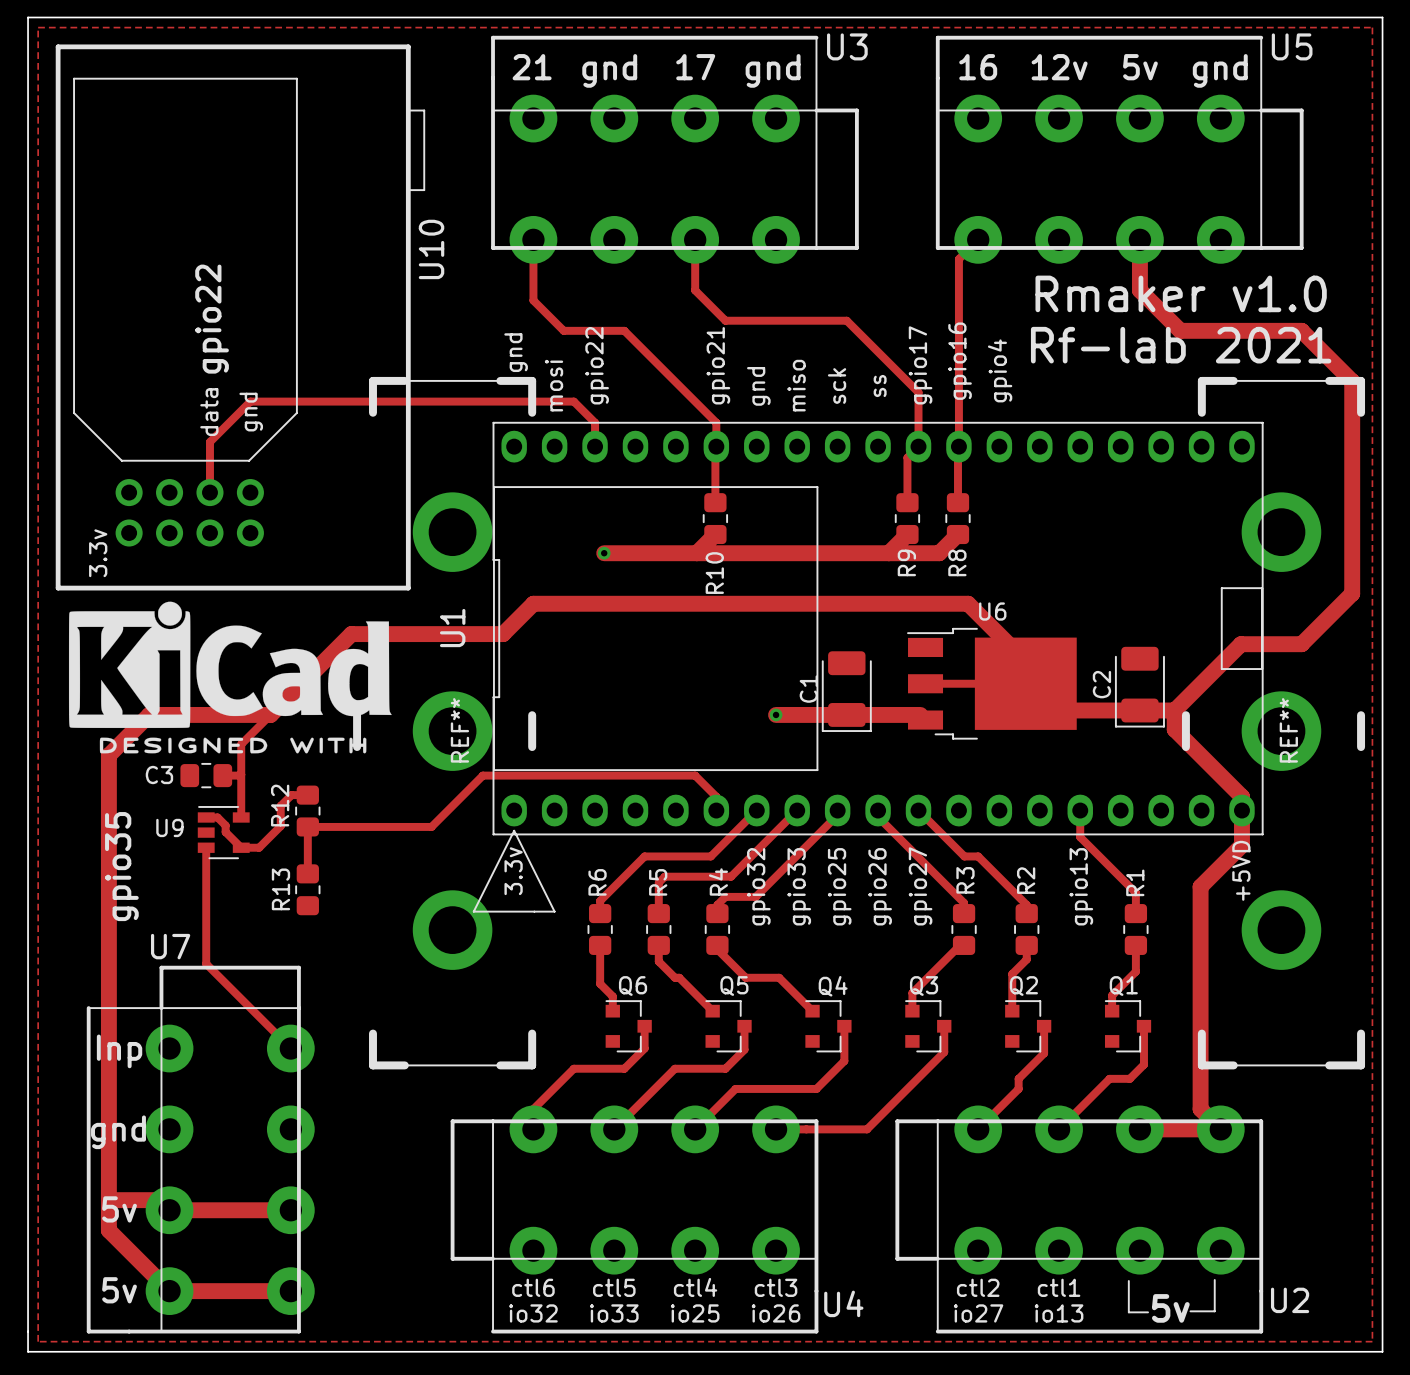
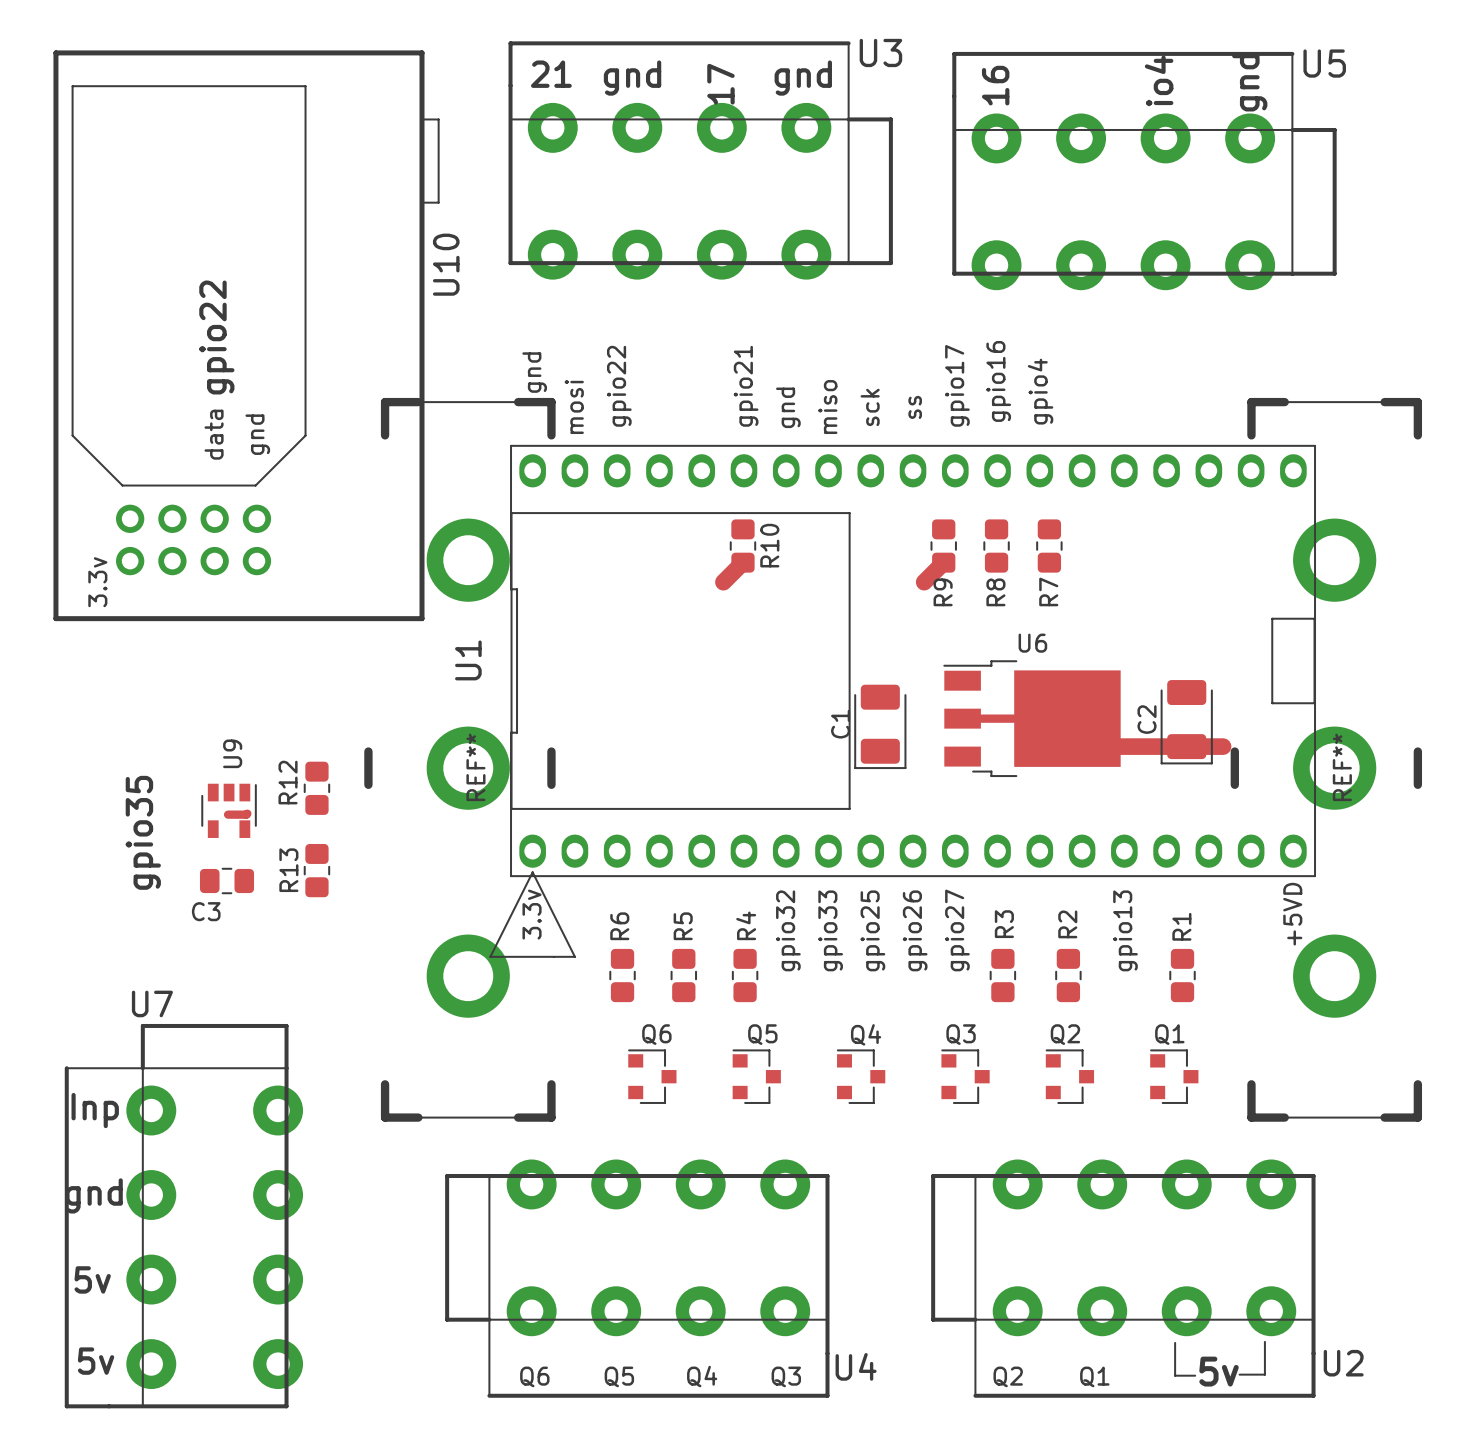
board edge: (28, 17) (28, 1351) (1382, 1351) (1382, 17) (28, 17) -> none
zone outline: (38, 27) (38, 1341) (1372, 1341) (1372, 27) (38, 27) -> none
text rotation: 0° (695, 67) -> 90° counterclockwise (720, 84)
text rotation: 0° (978, 67) -> 90° counterclockwise (995, 85)
text: 12v (1059, 67) -> none
text: 5v (1140, 67) -> none
text rotation: 0° (1220, 70) -> 90° counterclockwise (1249, 82)
text: none -> io4 (1159, 80)
U5 position: (1119, 149) -> (1144, 171)
track: (533, 239) (533, 300) (563, 330) (624, 330) (716, 422) (715, 502) -> none
track: (695, 239) (695, 290) (725, 320) (846, 320) (918, 392) (918, 446) (907, 457) (907, 502) -> none
track: (978, 239) (958, 259) (957, 502) -> none
track: (1139, 239) (1139, 290) (1180, 330) (1301, 330) (1352, 381) (1352, 593) (1301, 644) (1241, 644) (1174, 710) (1174, 729) (1241, 796) (1241, 845) (1200, 886) (1200, 1109) (1220, 1129) (1139, 1129) -> none
text: Rmaker v1.0 (1181, 293) -> none
text: Rf-lab 2021 (1181, 345) -> none
track: (595, 446) (595, 422) (573, 401) (250, 401) (209, 442) (209, 492) -> none
R7: none -> (1049, 546)
track: (957, 534) (939, 553) (604, 553) -> none
via: (604, 553) -> none
R10 name position: R10 (714, 573) -> R10 (769, 545)
drawing: [68, 601, 392, 754] -> none
track: (1025, 683) (1025, 661) (968, 603) (533, 603) (503, 634) (351, 634) (270, 714) -> none
track: (270, 714) (241, 744) (241, 817) -> none
track: (270, 714) (149, 714) (108, 755) (108, 1230) (169, 1291) (290, 1291) -> none
track: (776, 714) (920, 714) (925, 720) -> none
via: (776, 714) -> none
C3 name position: C3 (159, 775) -> C3 (206, 911)
C3 position: (206, 775) -> (227, 881)
track: (307, 795) (291, 795) (280, 805) (280, 826) (259, 847) (241, 847) (225, 832) (225, 825) (217, 817) (206, 817) -> none
track: (716, 810) (716, 796) (695, 775) (482, 775) (431, 826) (307, 826) (307, 873) -> none
track: (756, 810) (710, 856) (644, 856) (600, 900) (600, 913) -> none
track: (797, 810) (731, 876) (664, 876) (658, 882) (658, 913) -> none
track: (837, 810) (837, 815) (755, 896) (725, 896) (717, 904) (717, 913) -> none
track: (878, 810) (878, 816) (964, 902) (964, 913) -> none
track: (918, 810) (964, 856) (978, 856) (1026, 904) (1026, 913) -> none
track: (1080, 810) (1080, 837) (1135, 892) (1135, 913) -> none
R12 position: (307, 811) -> (316, 788)
U9 rotation: 0° (223, 832) -> 90° clockwise (229, 810)
U9 position: (223, 832) -> (229, 810)
track: (206, 847) (206, 963) (290, 1048) -> none
text position: gpio35 (121, 866) -> gpio35 (143, 832)
R13 position: (307, 889) -> (316, 870)
track: (600, 945) (600, 983) (612, 996) (612, 1011) -> none
track: (658, 945) (658, 961) (674, 977) (679, 977) (712, 1011) -> none
track: (717, 945) (717, 949) (745, 977) (779, 977) (812, 1011) -> none
track: (964, 945) (960, 945) (912, 993) (912, 1011) -> none
track: (1026, 945) (1026, 959) (1012, 974) (1012, 1011) -> none
track: (1135, 945) (1135, 971) (1112, 995) (1112, 1011) -> none
track: (644, 1026) (644, 1048) (624, 1068) (573, 1068) (533, 1109) (533, 1129) -> none
track: (744, 1026) (744, 1049) (725, 1068) (674, 1068) (614, 1129) -> none
track: (844, 1026) (844, 1061) (816, 1088) (735, 1088) (695, 1129) -> none
track: (944, 1026) (944, 1052) (867, 1129) (776, 1129) -> none
track: (1044, 1026) (1044, 1053) (1018, 1078) (1018, 1088) (978, 1129) -> none
track: (1143, 1026) (1143, 1064) (1129, 1078) (1109, 1078) (1059, 1129) -> none
text position: Inp (119, 1051) -> Inp (95, 1110)
text position: gnd (118, 1132) -> gnd (94, 1195)
U7 position: (200, 1149) -> (183, 1216)
track: (108, 1200) (159, 1200) (169, 1210) (290, 1210) -> none
text position: 5v (119, 1209) -> 5v (92, 1279)
U4 position: (634, 1219) -> (637, 1278)
text: ctl6 (533, 1287) -> none
text: ctl5 (614, 1287) -> none
text: ctl4 (695, 1287) -> none
text: ctl3 (776, 1287) -> none
text: ctl2 (978, 1287) -> none
text: ctl1 (1059, 1287) -> none
text position: 5v (119, 1290) -> 5v (96, 1361)
text: none -> Q6 (534, 1376)
text: io32 (533, 1313) -> none
text: none -> Q5 (619, 1376)
text: io33 (614, 1313) -> none
text: none -> Q4 (702, 1376)
text: io25 (695, 1313) -> none
text: none -> Q3 (786, 1376)
text: io26 (776, 1313) -> none
text: io27 (978, 1313) -> Q2 (1008, 1376)
text: io13 (1059, 1313) -> Q1 (1094, 1376)

